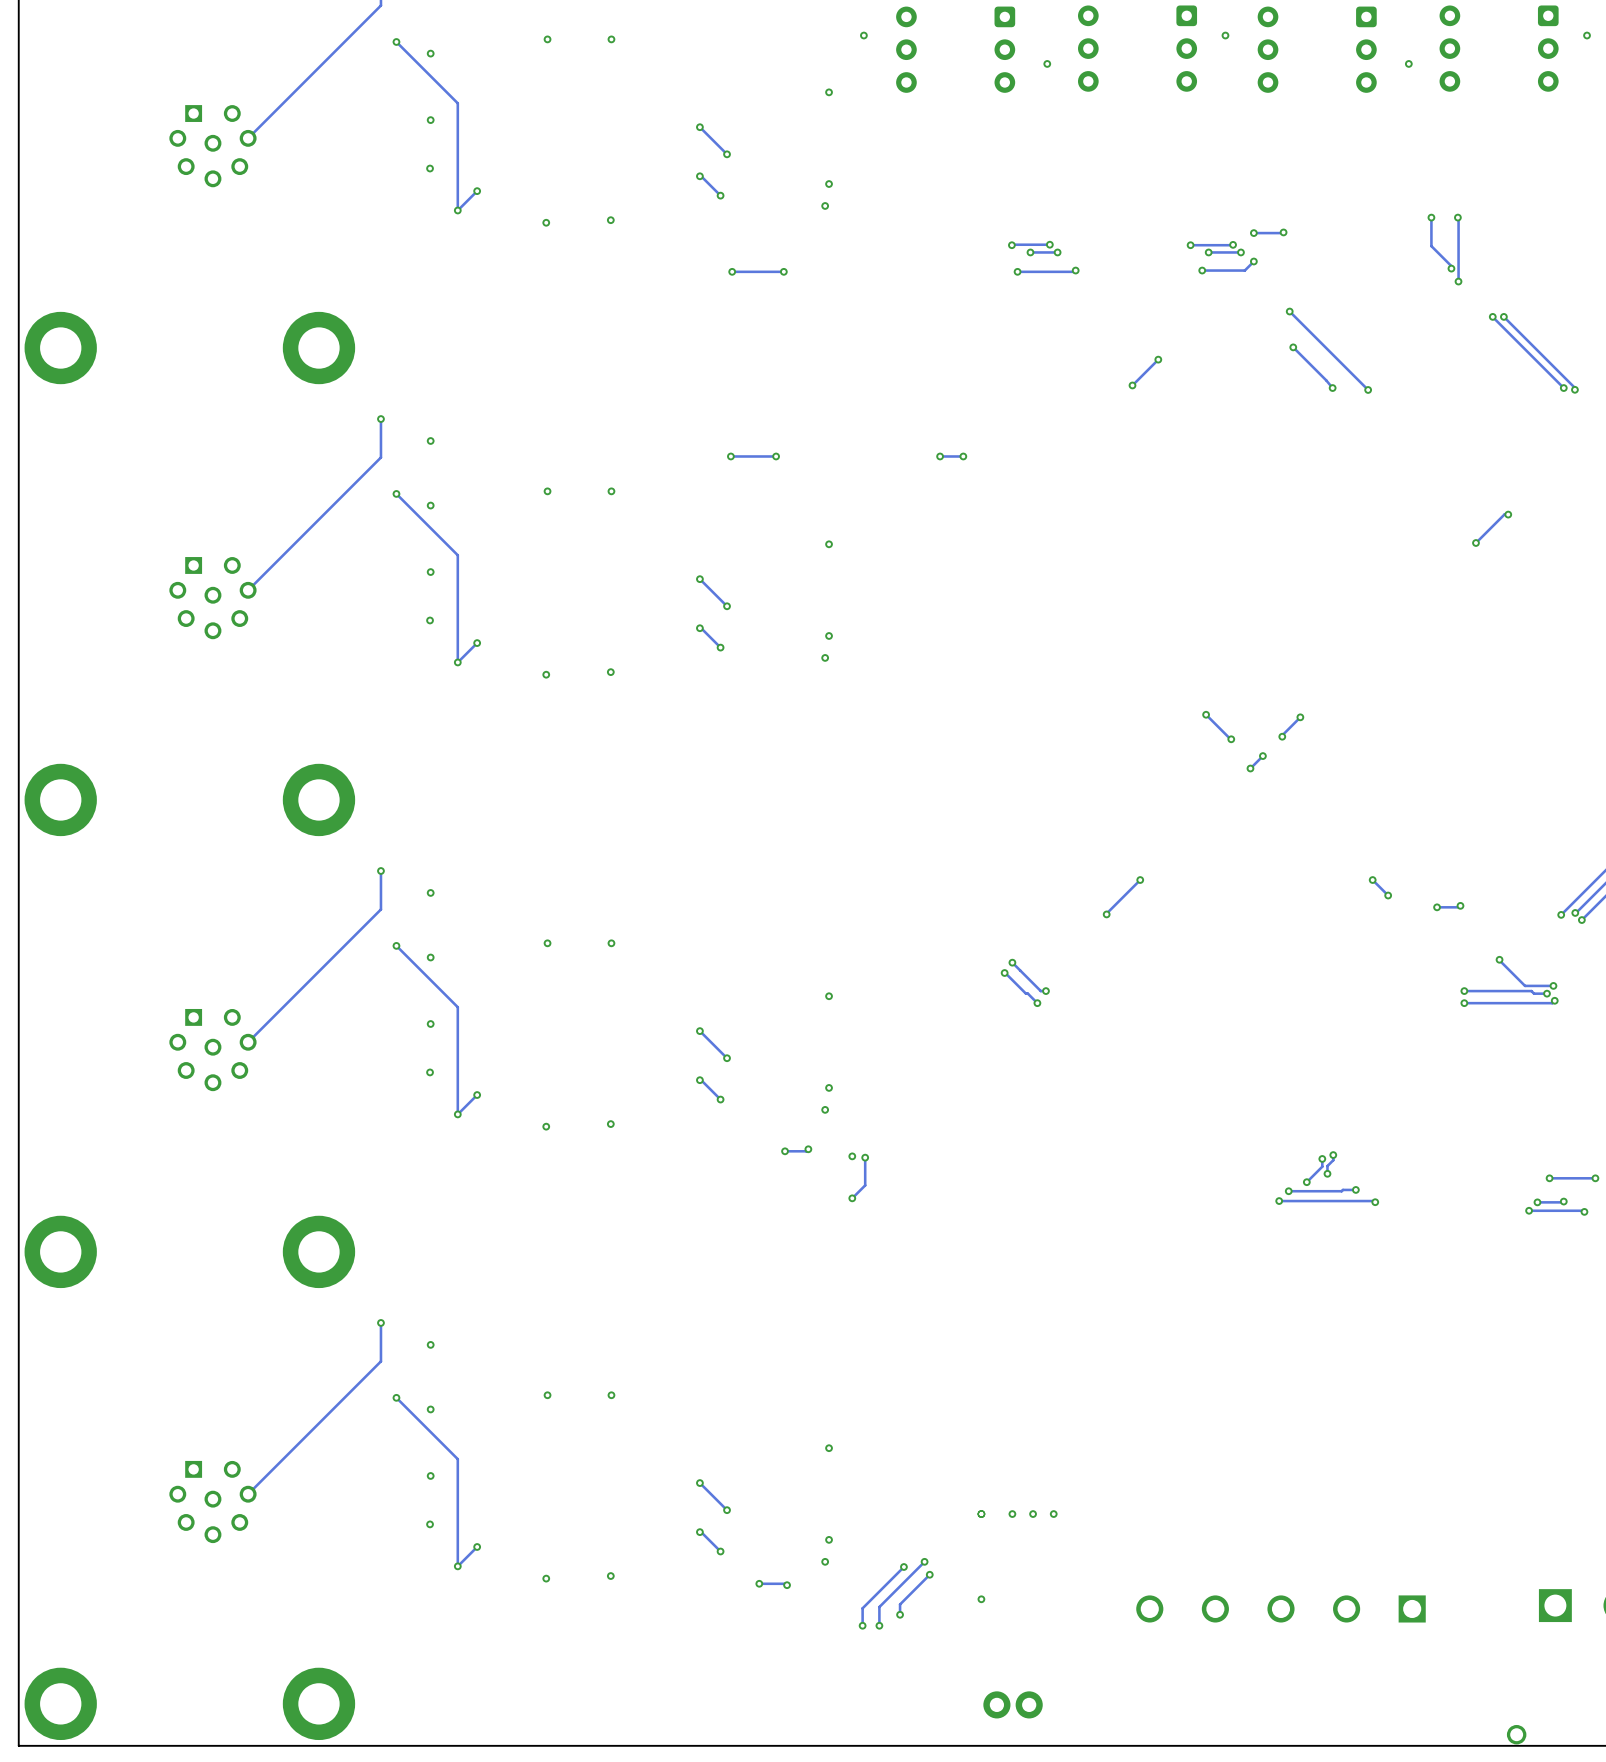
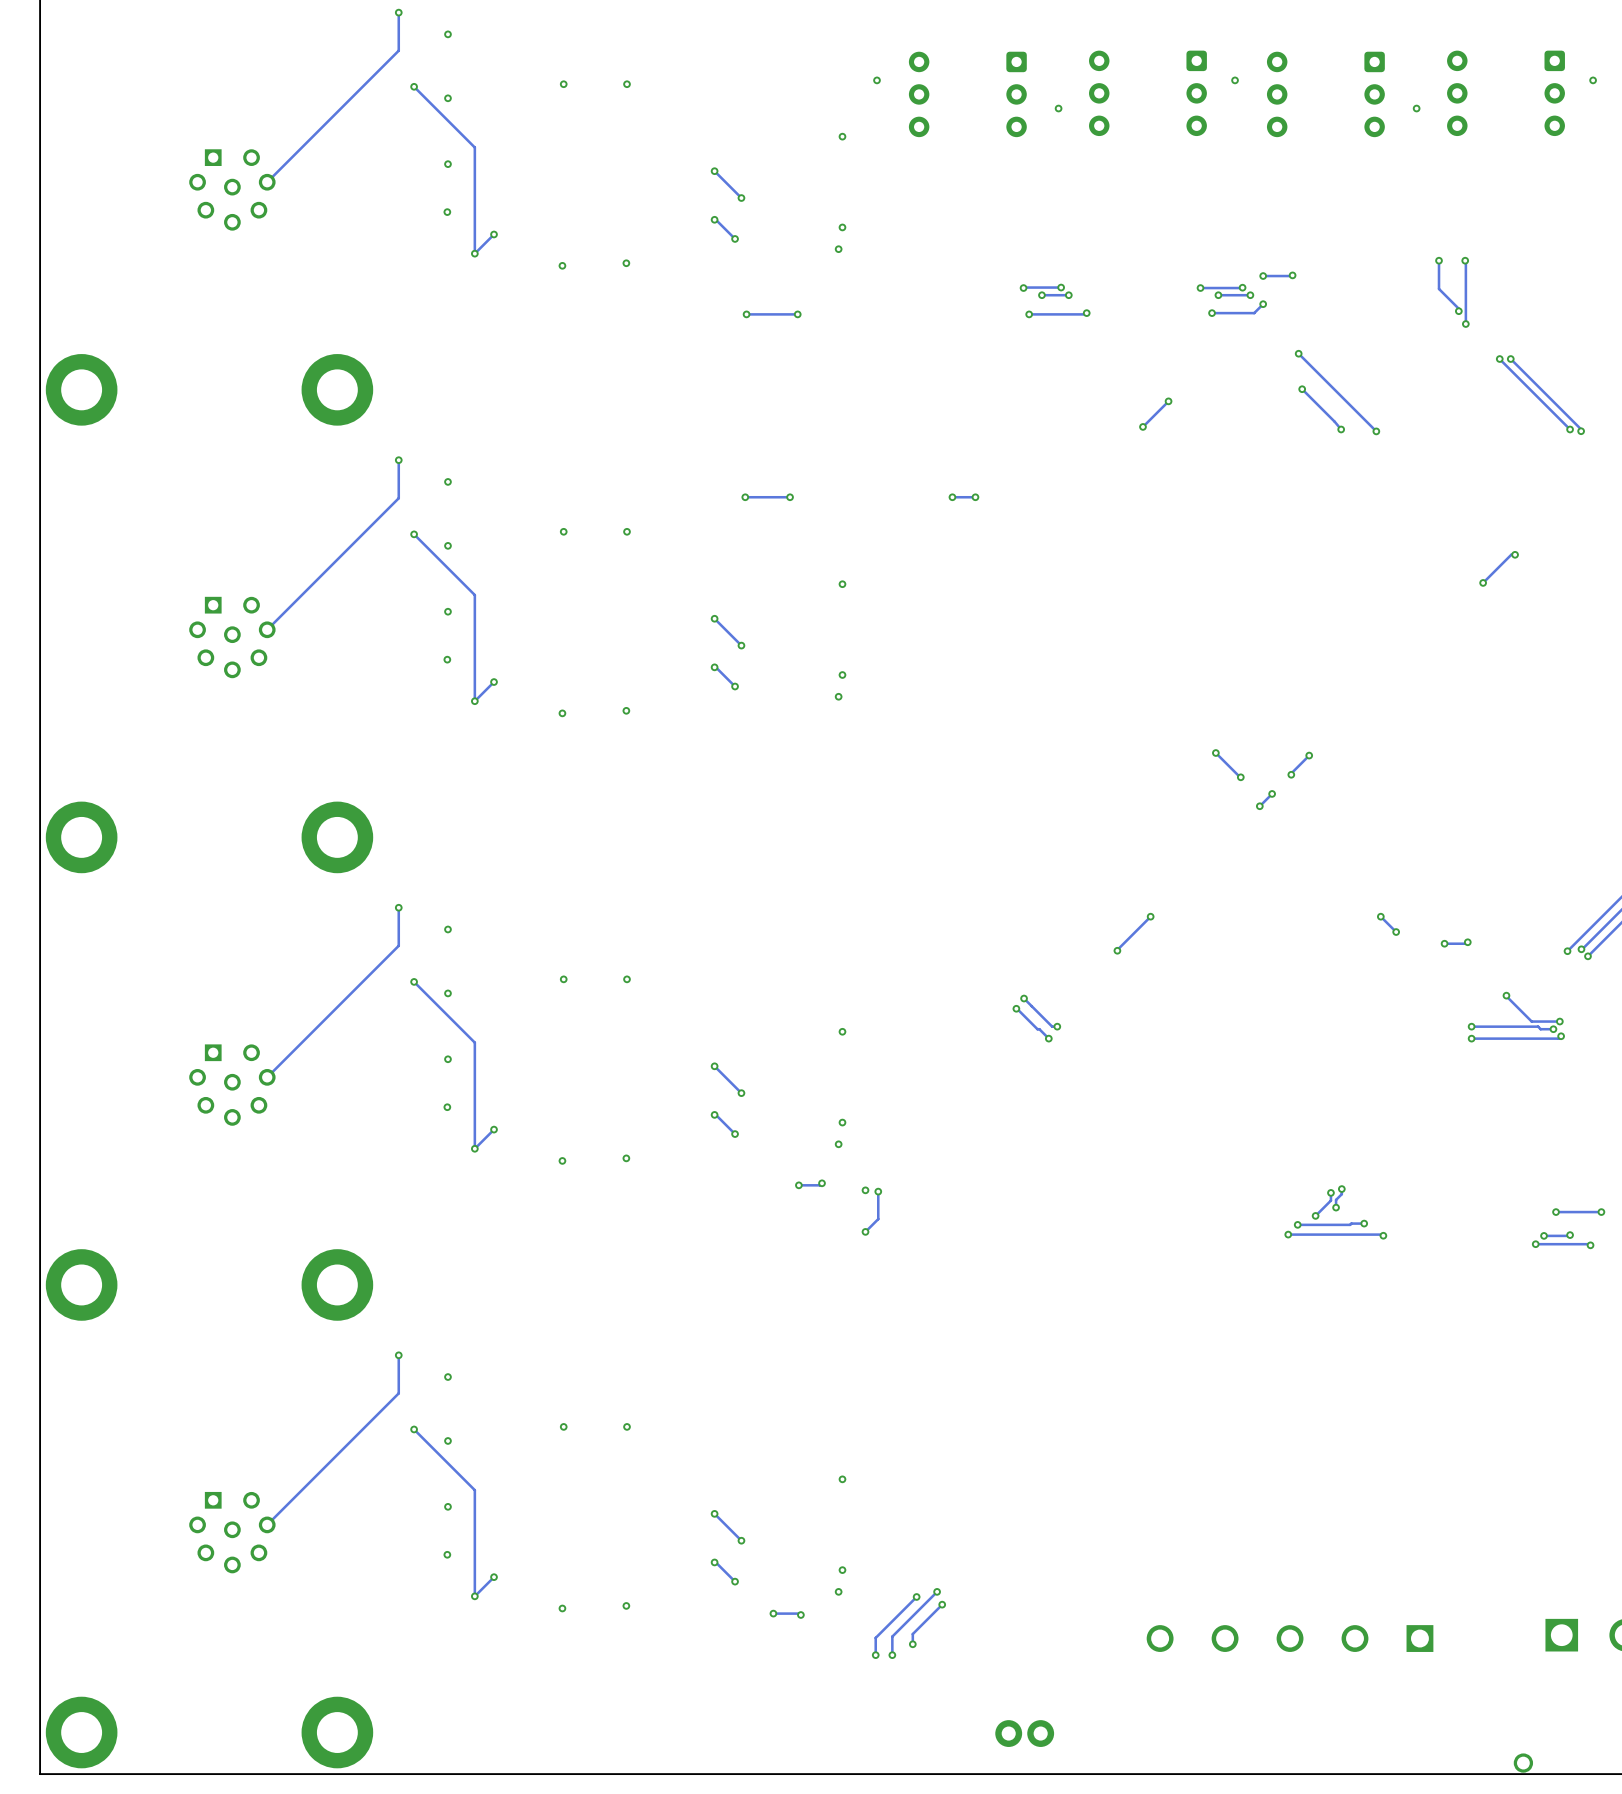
via: (981, 1514) -> none
via: (1012, 1514) -> none
via: (1033, 1514) -> none
via: (1053, 1514) -> none
via: (981, 1599) -> none

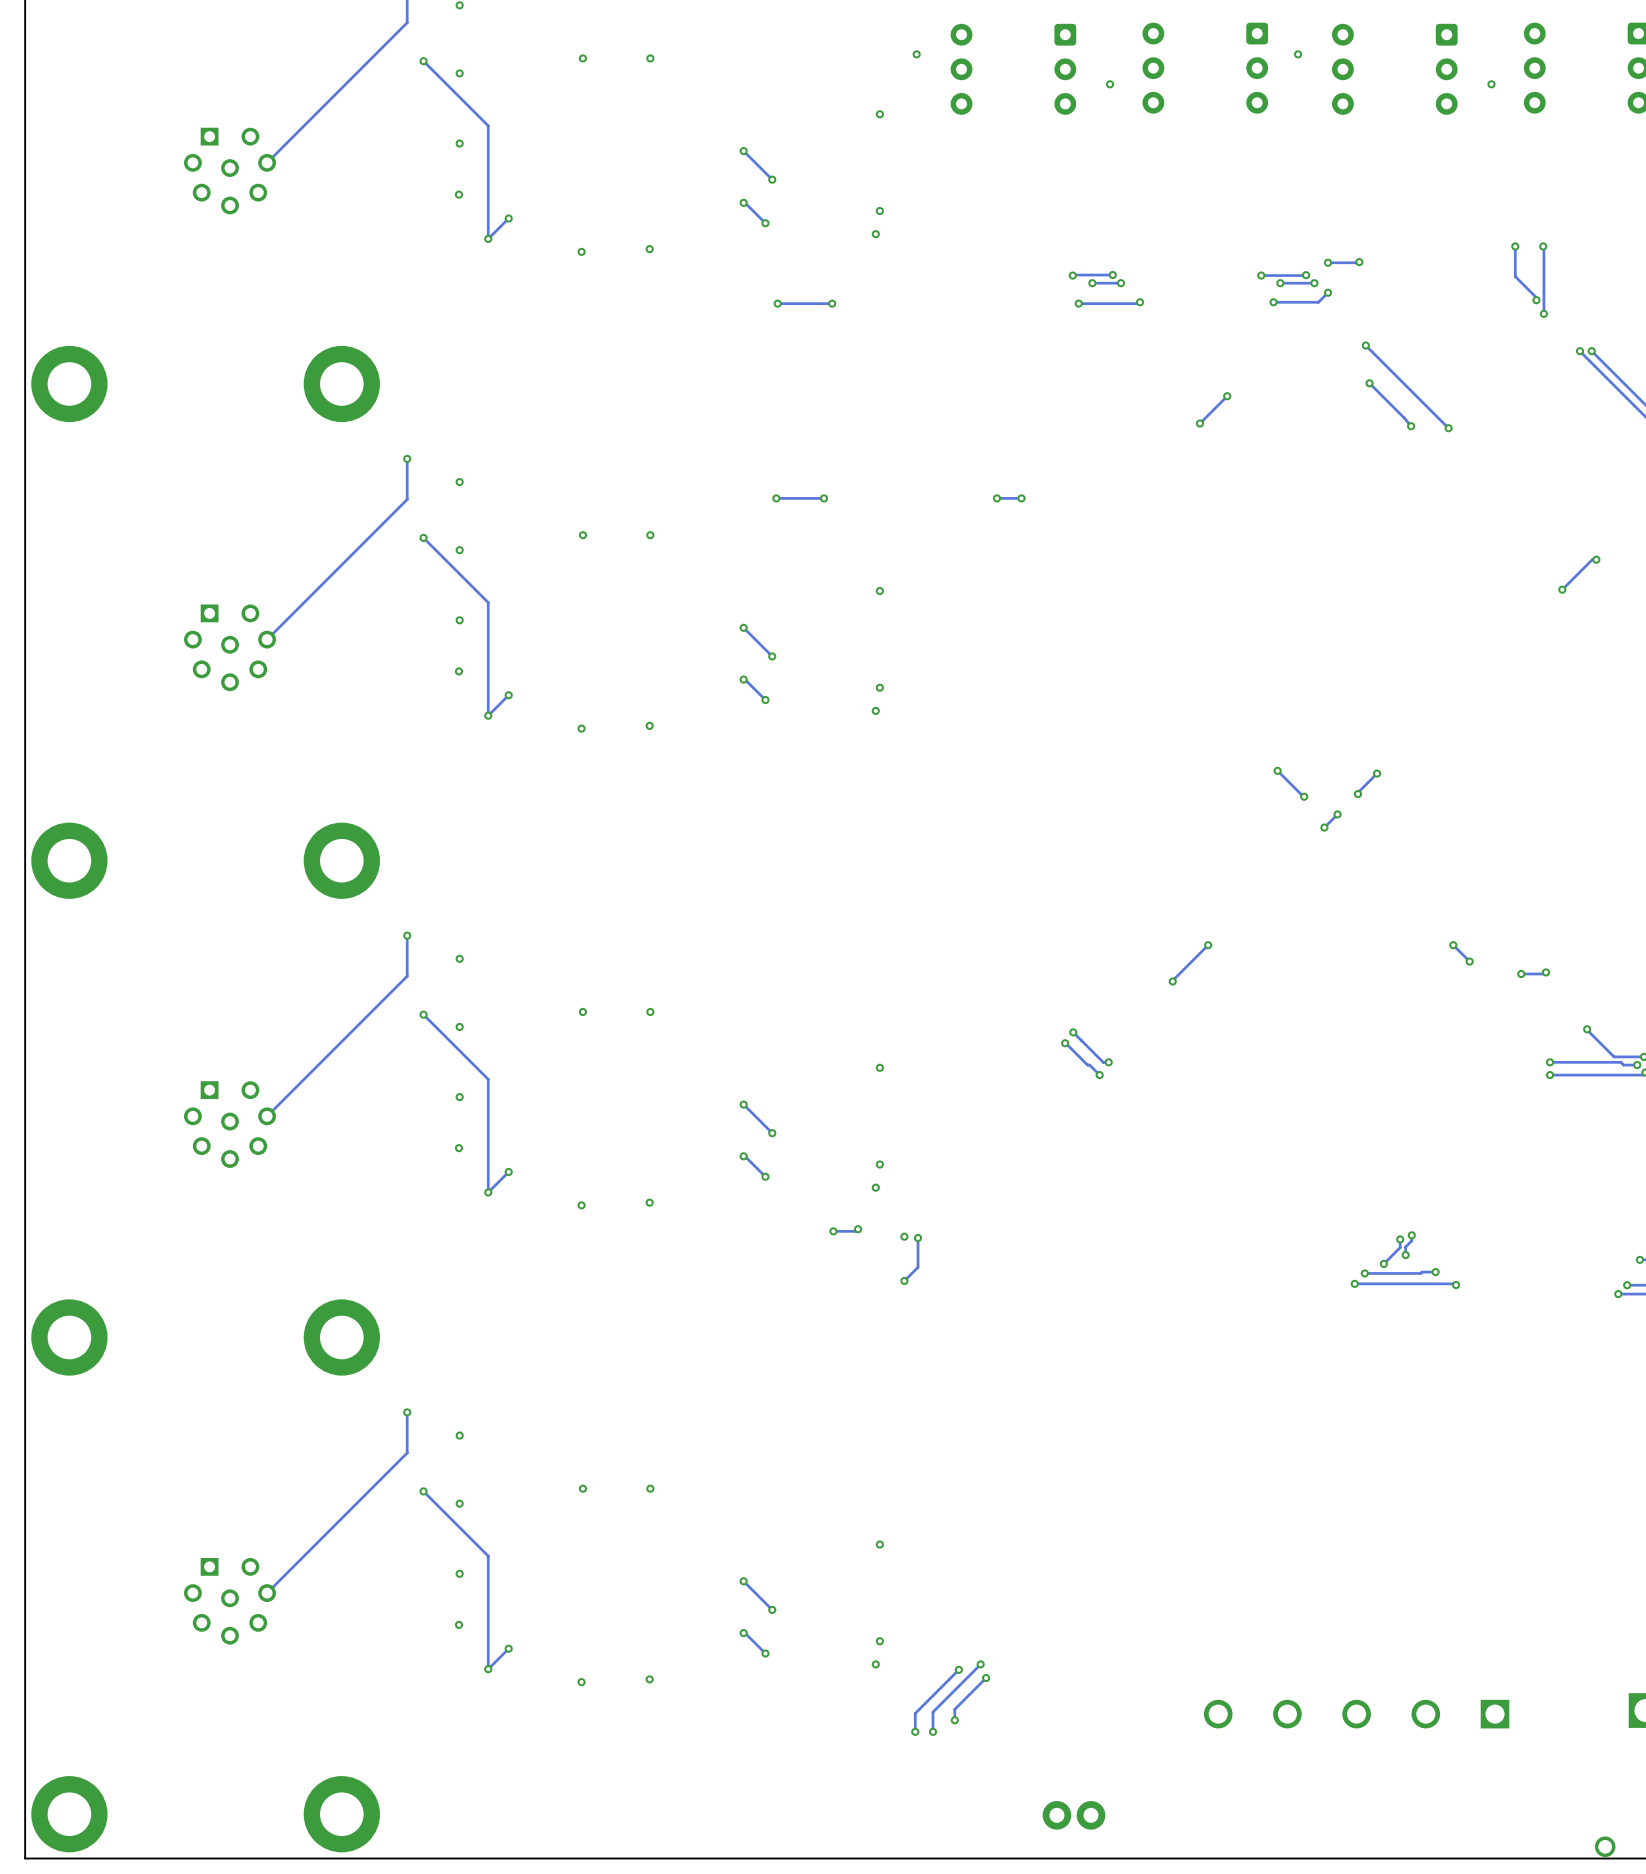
track: (773, 1613) (800, 1614) -> none
via: (773, 1613) -> none
via: (800, 1614) -> none

